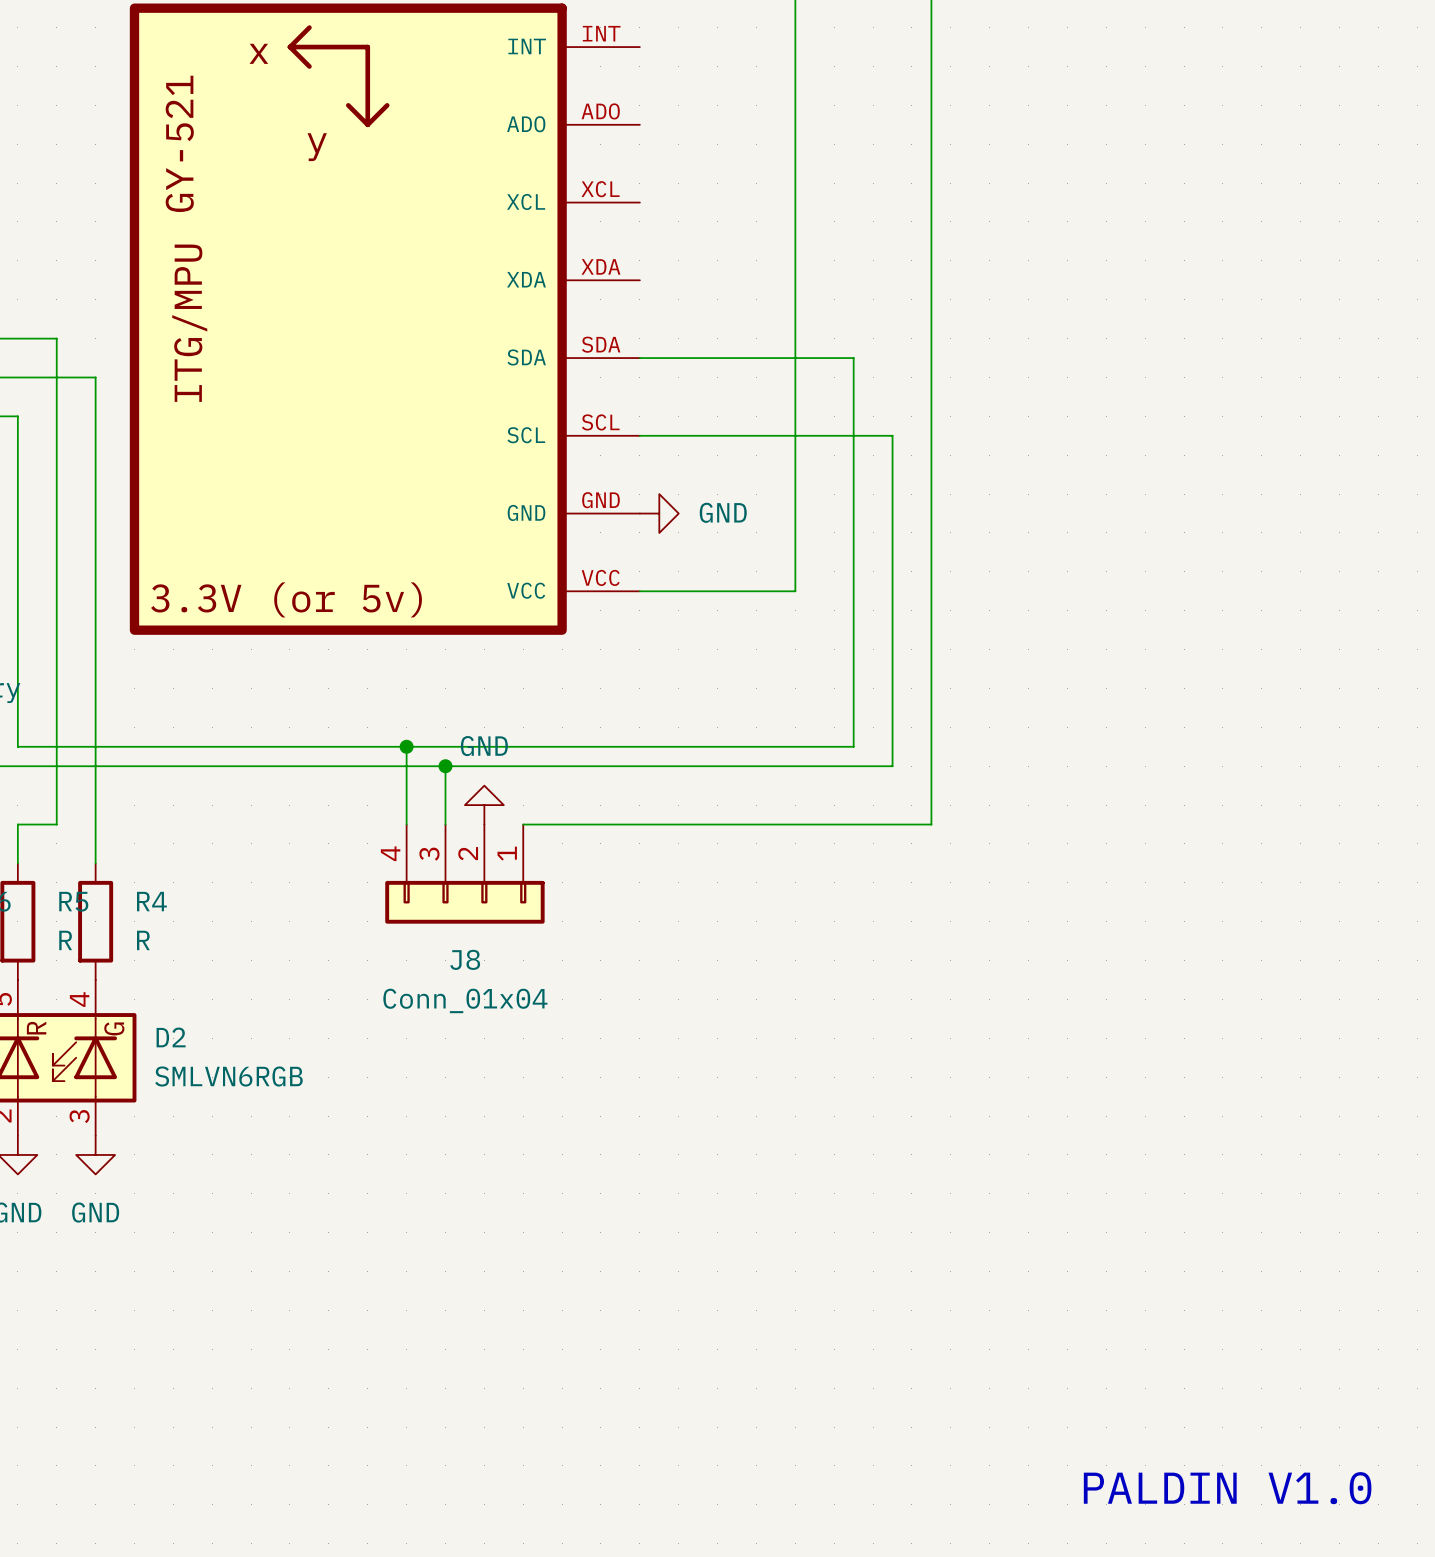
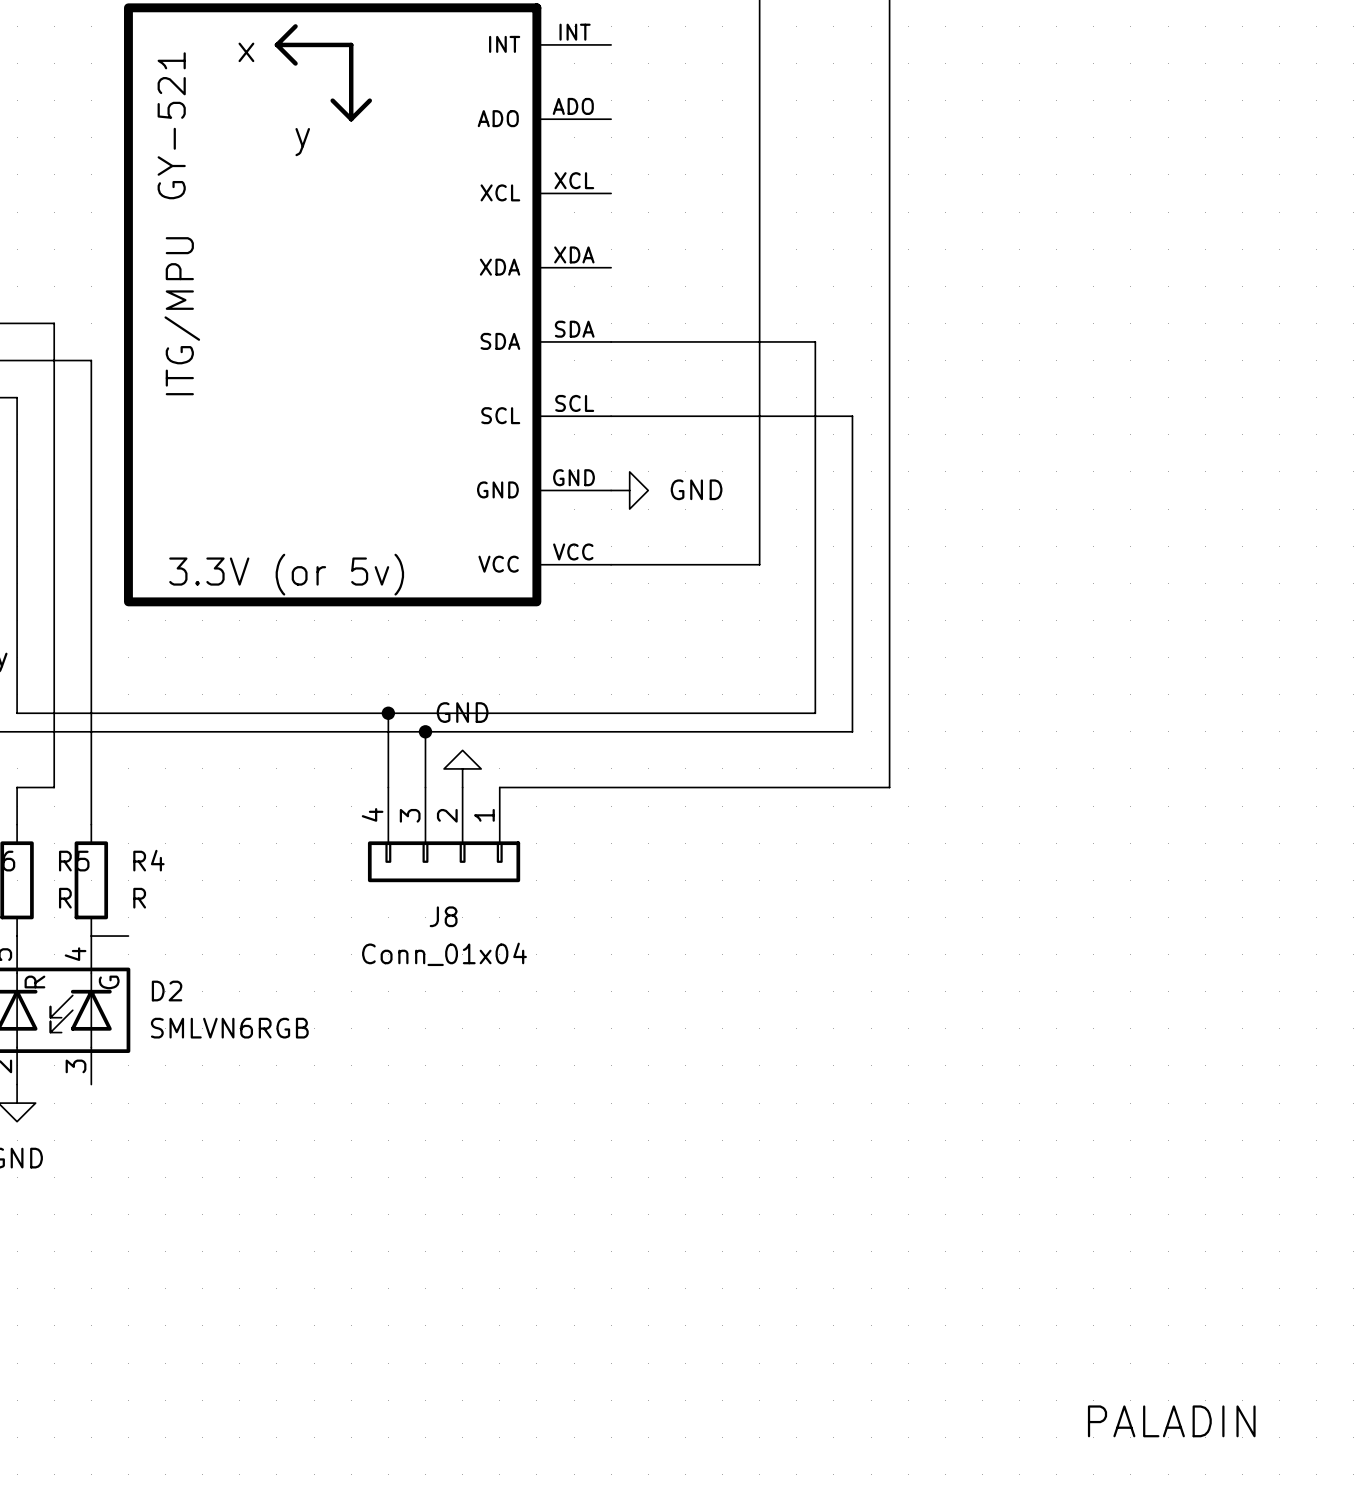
wire: none -> (91, 936) (128, 936)
power symbol: GND (95, 1154) -> none
text: PALDIN V1.0 (1227, 1488) -> PALADIN (1171, 1421)

